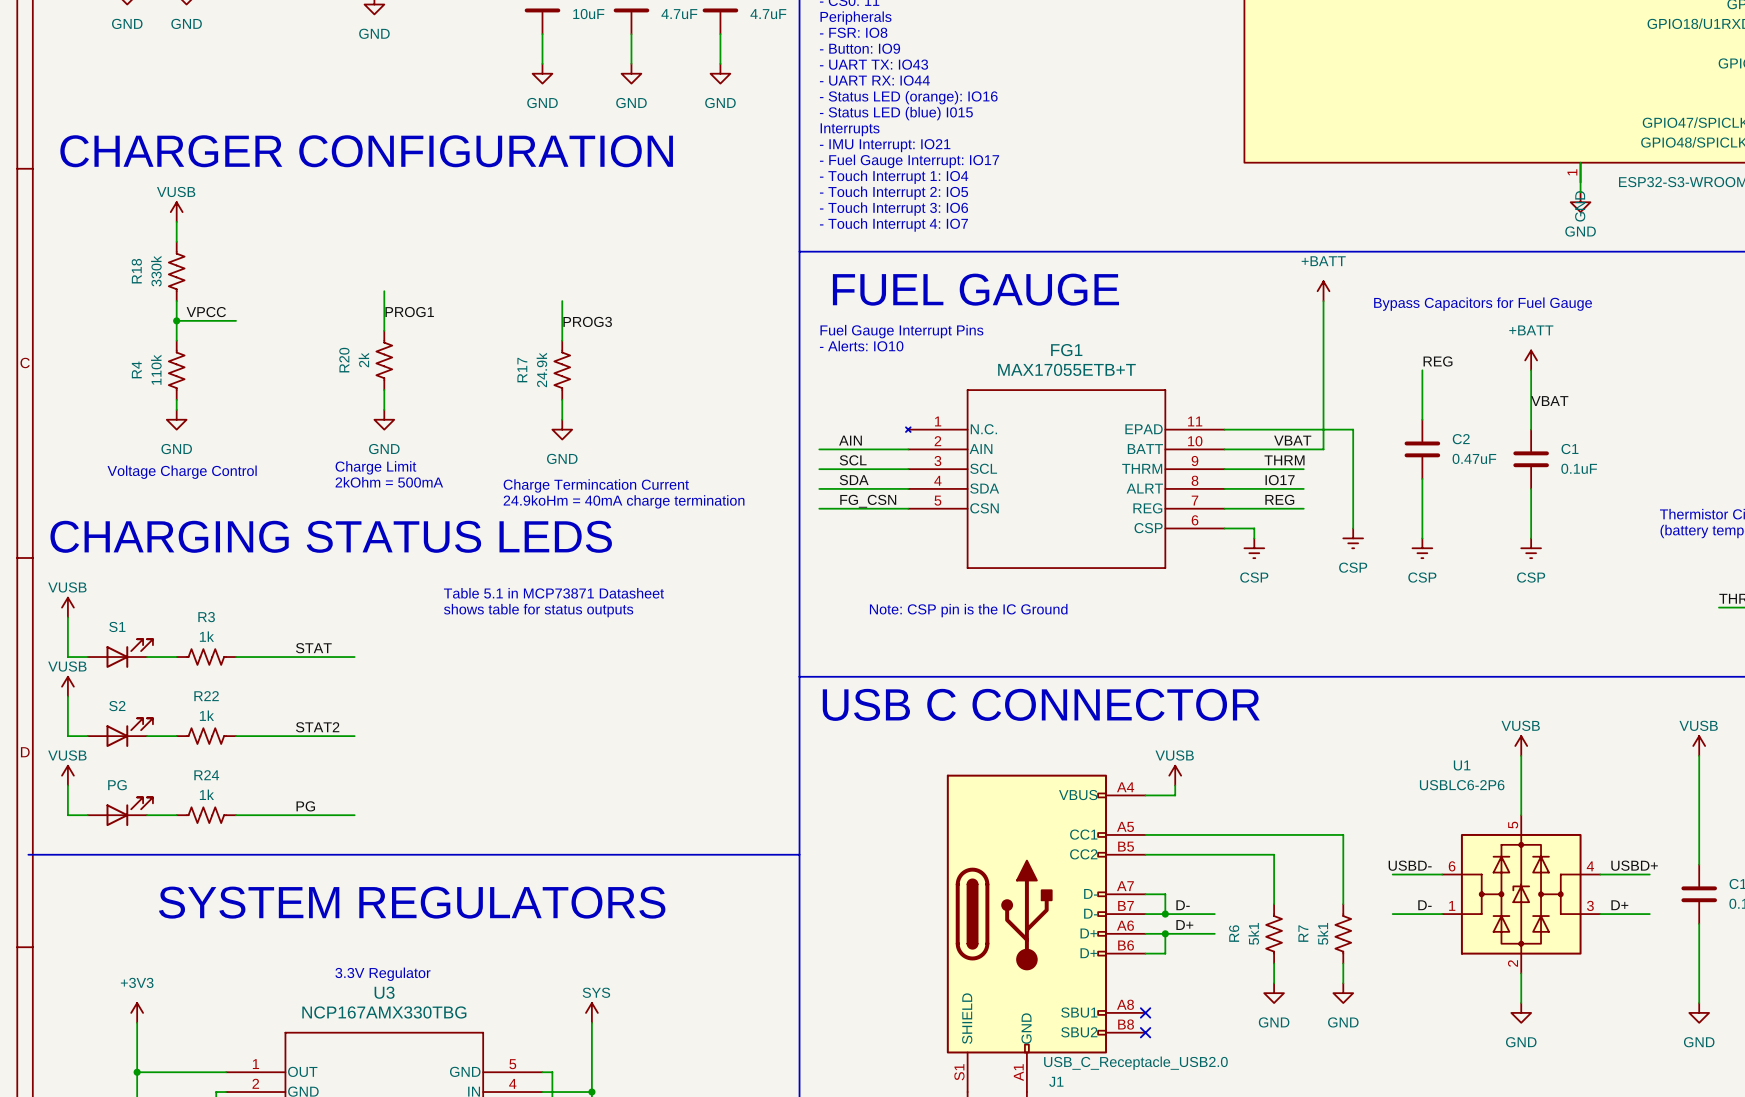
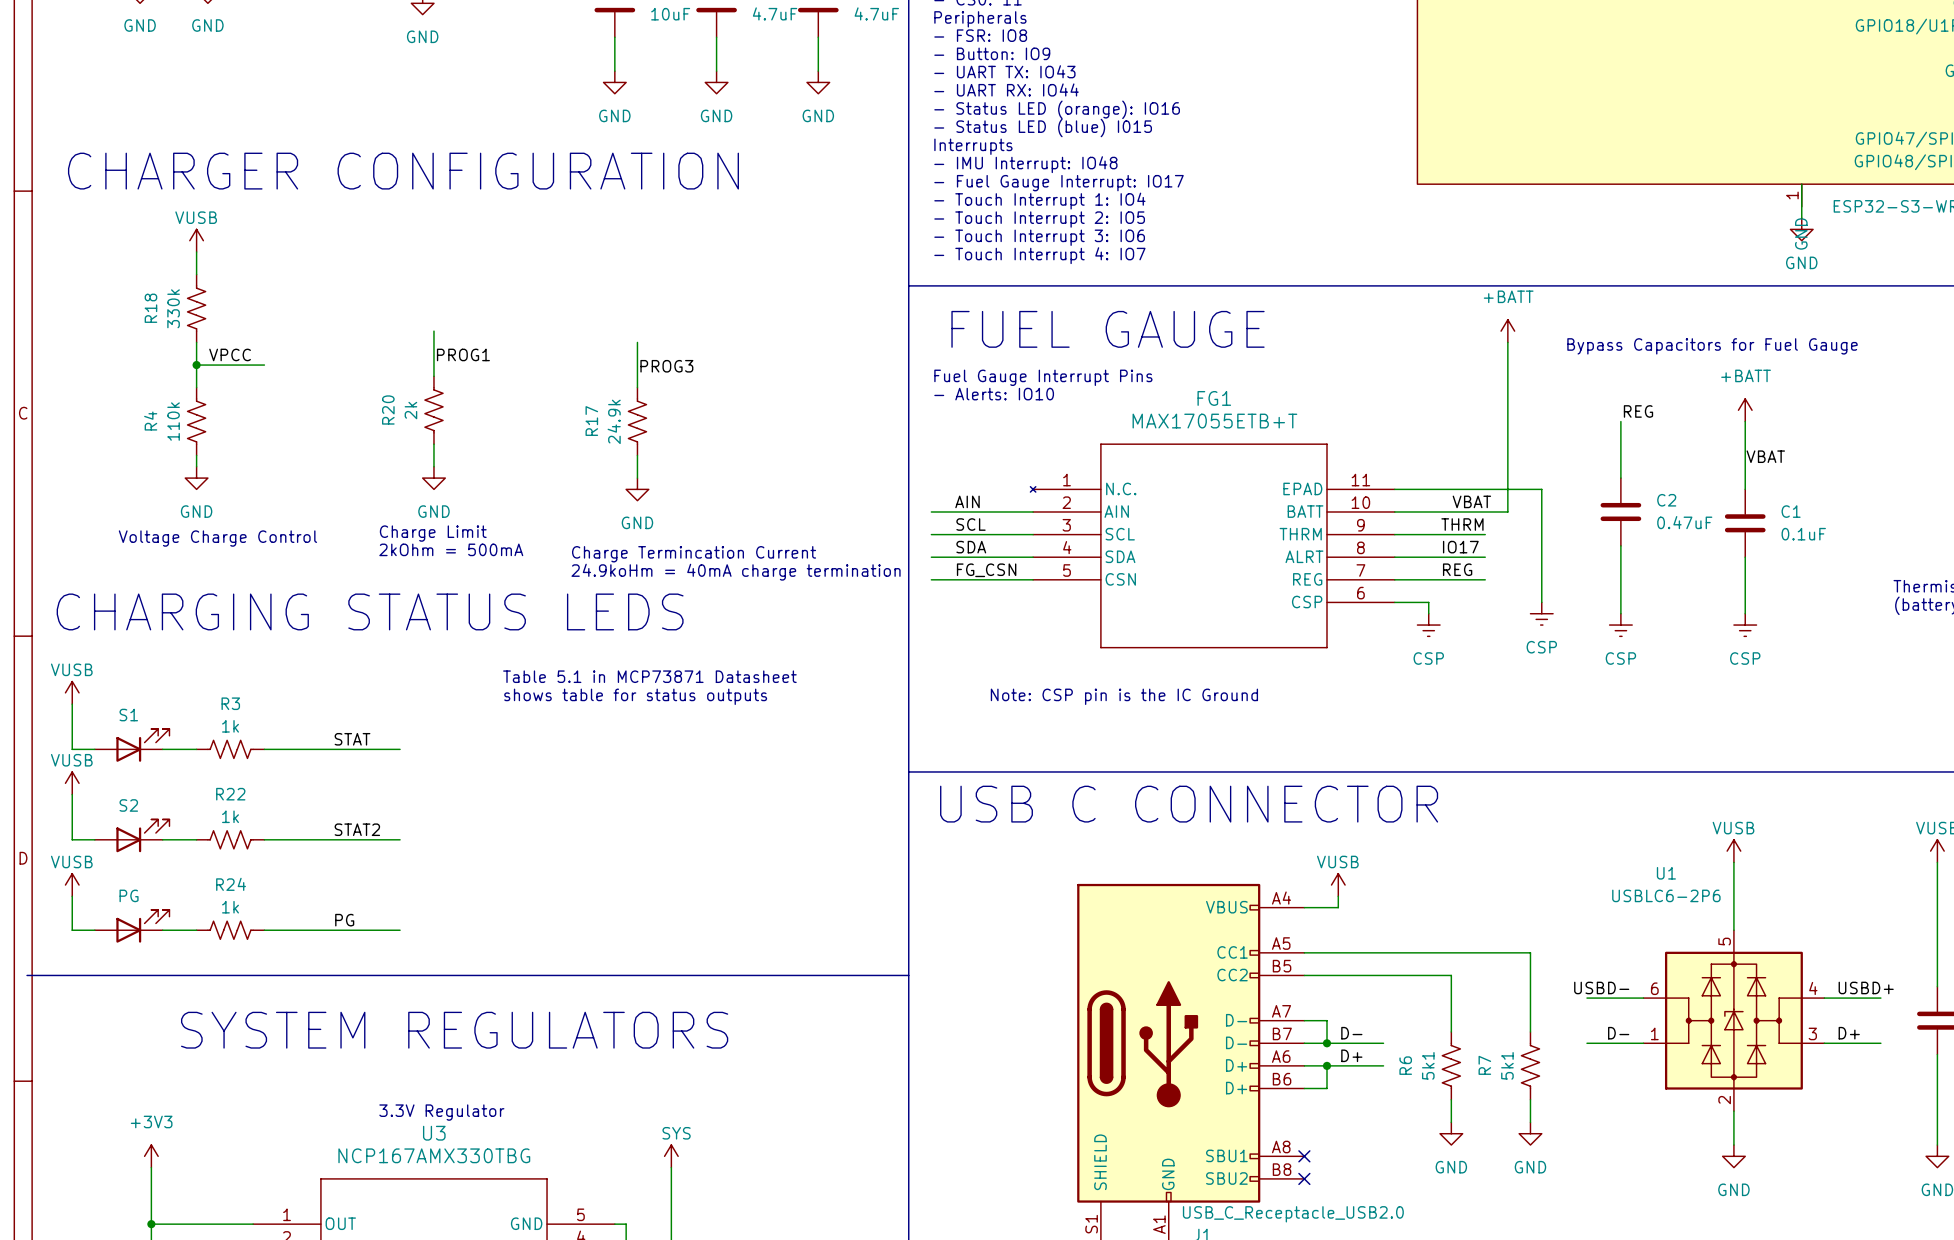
text: - IMU Interrupt: IO21 (885, 145) -> - IMU Interrupt: IO48 (1025, 164)

